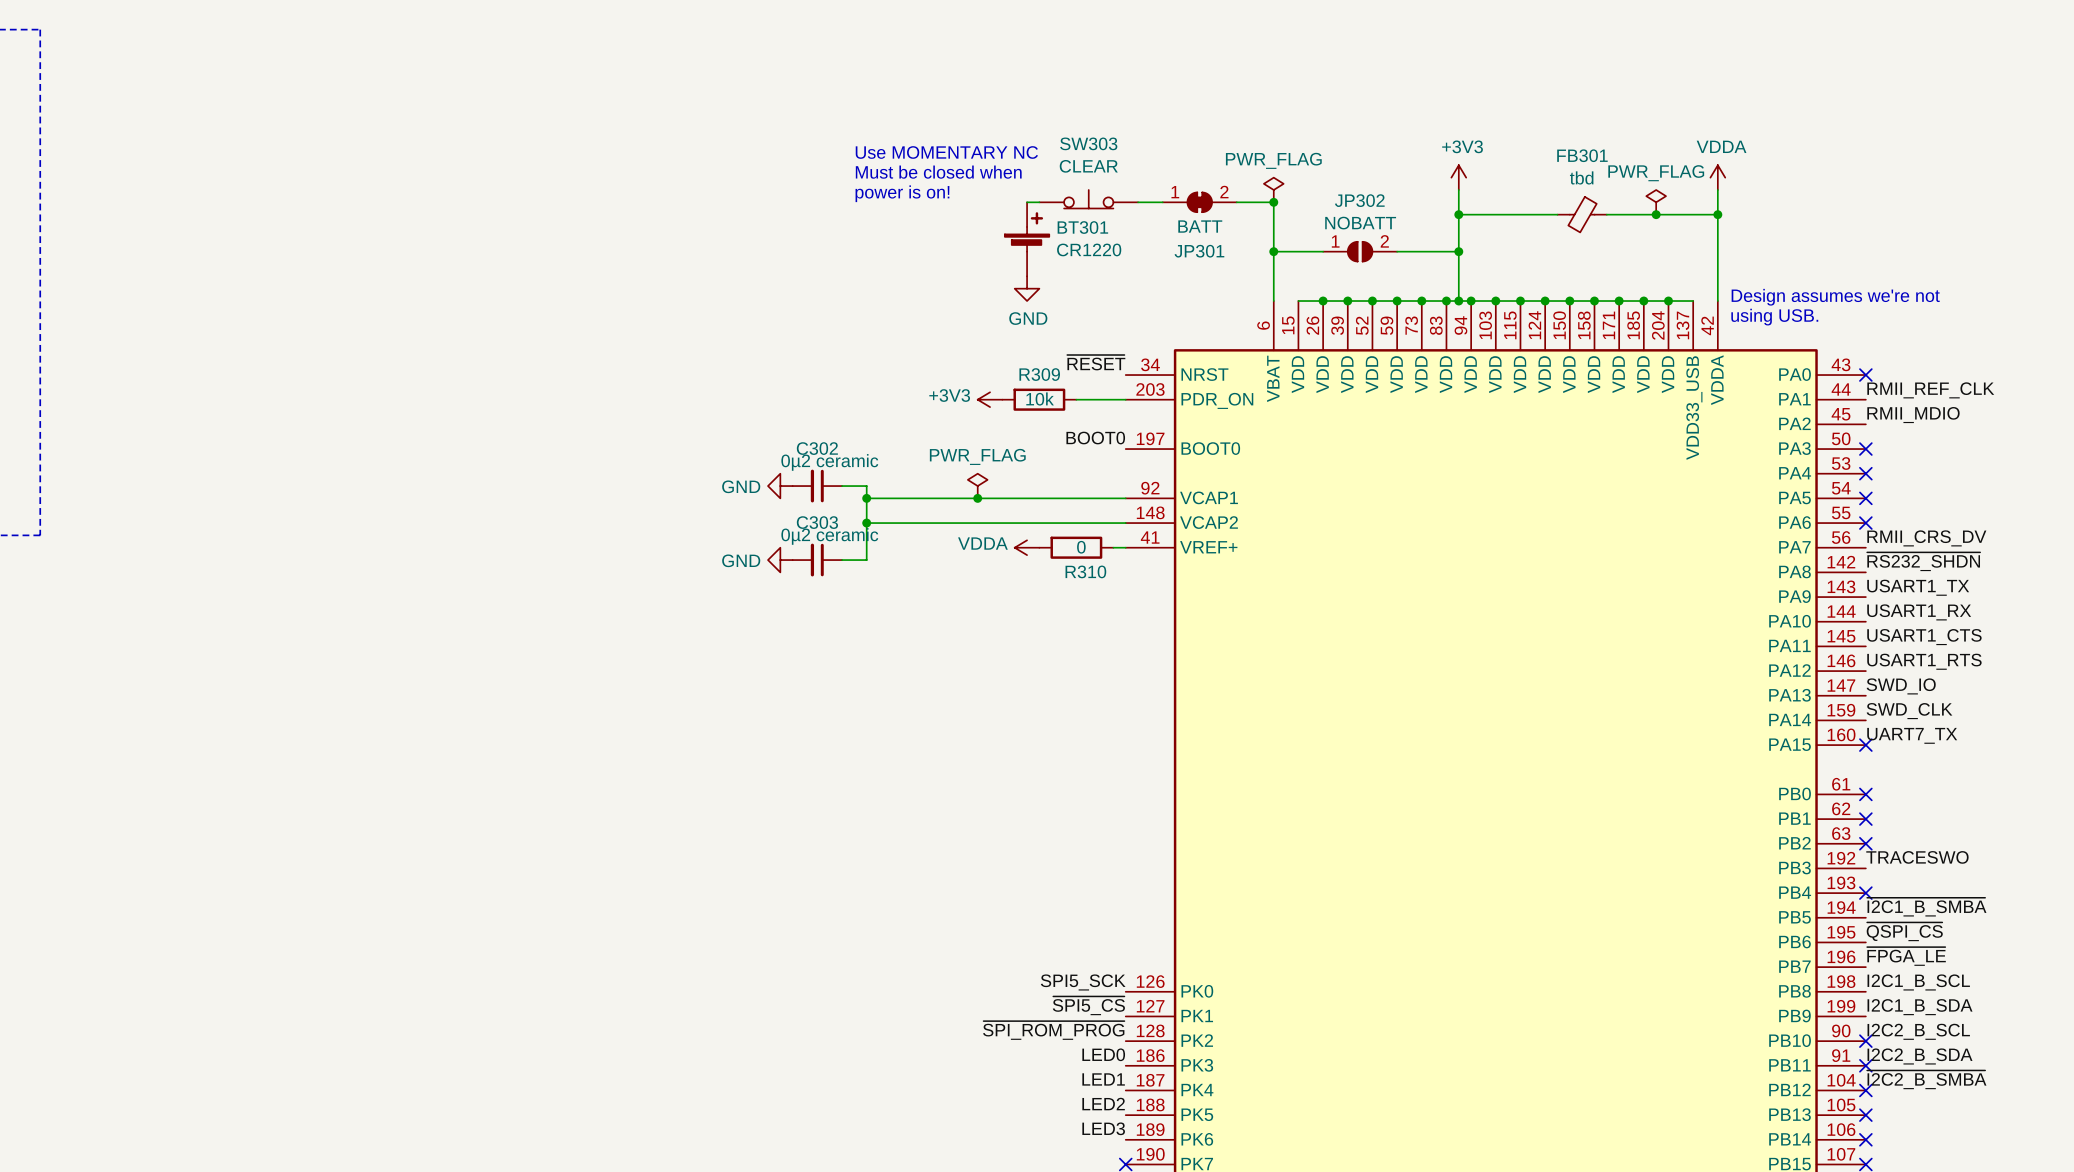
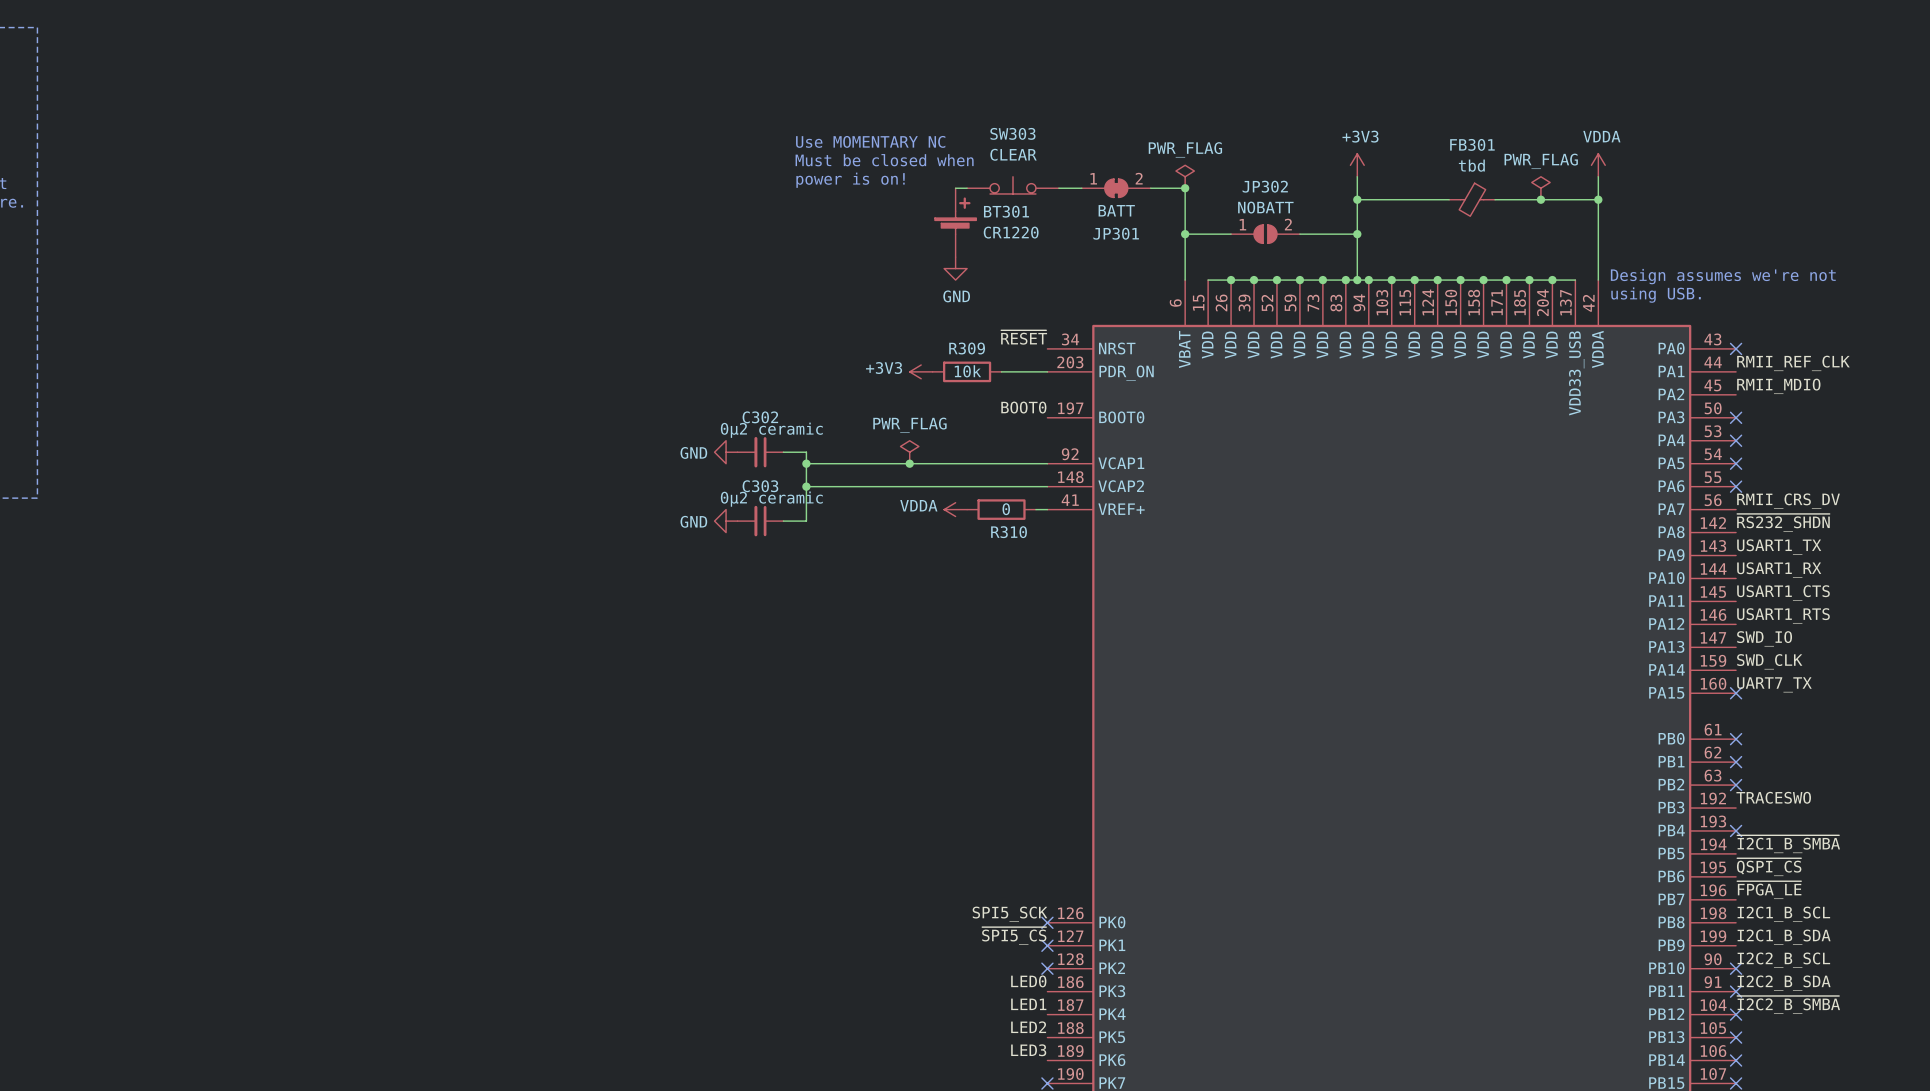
no-connect mark: none -> (1047, 922)
no-connect mark: none -> (1047, 945)
label: ~{SPI_ROM_PROG} (1053, 1030) -> none
no-connect mark: none -> (1047, 968)

